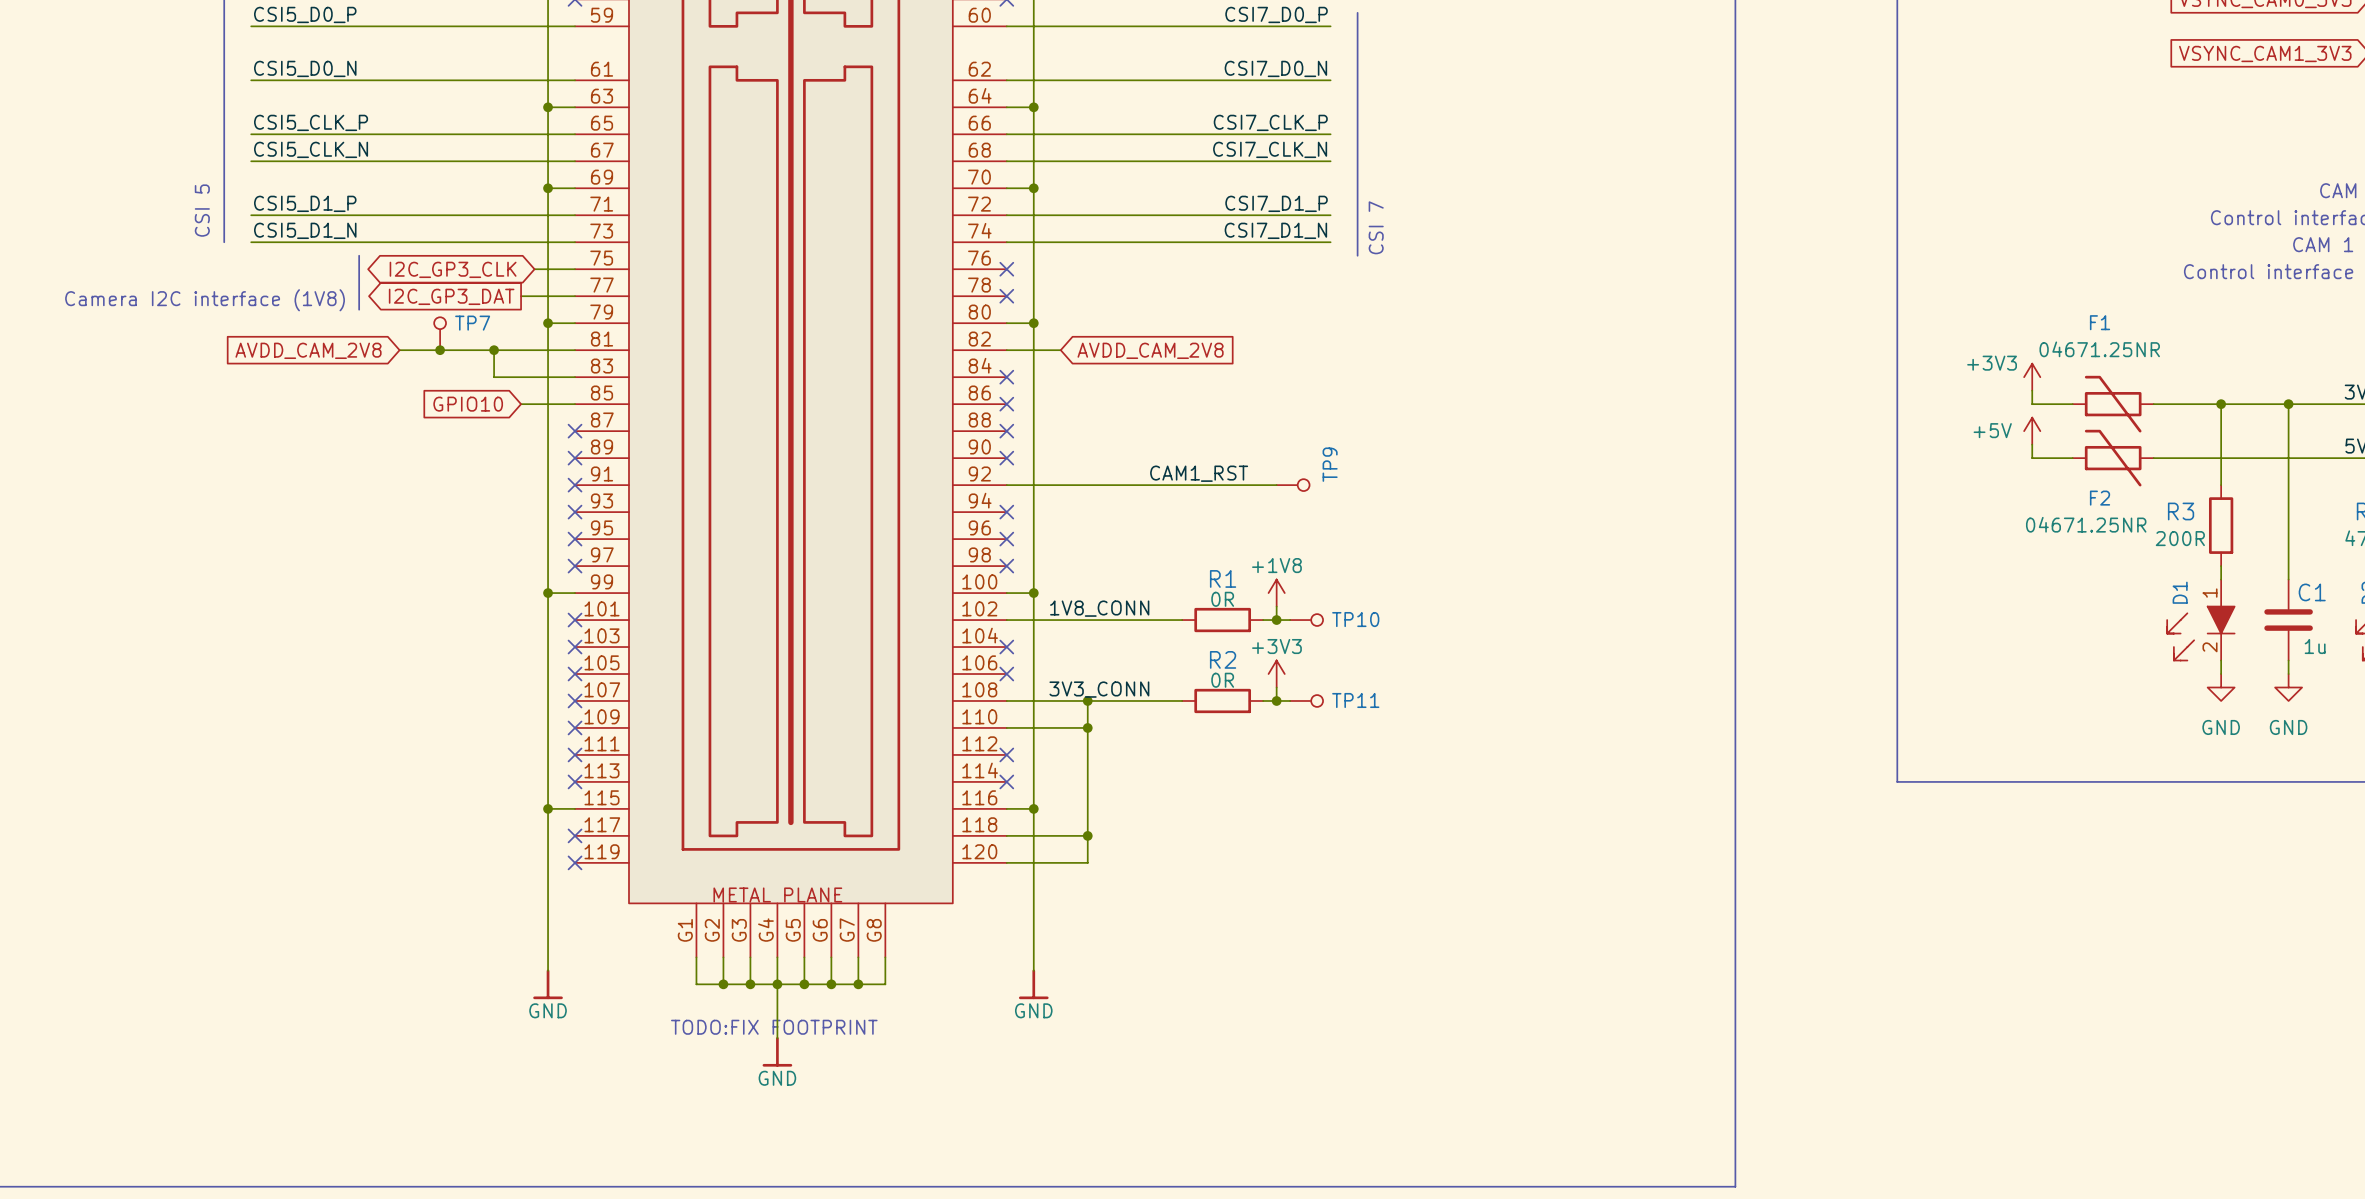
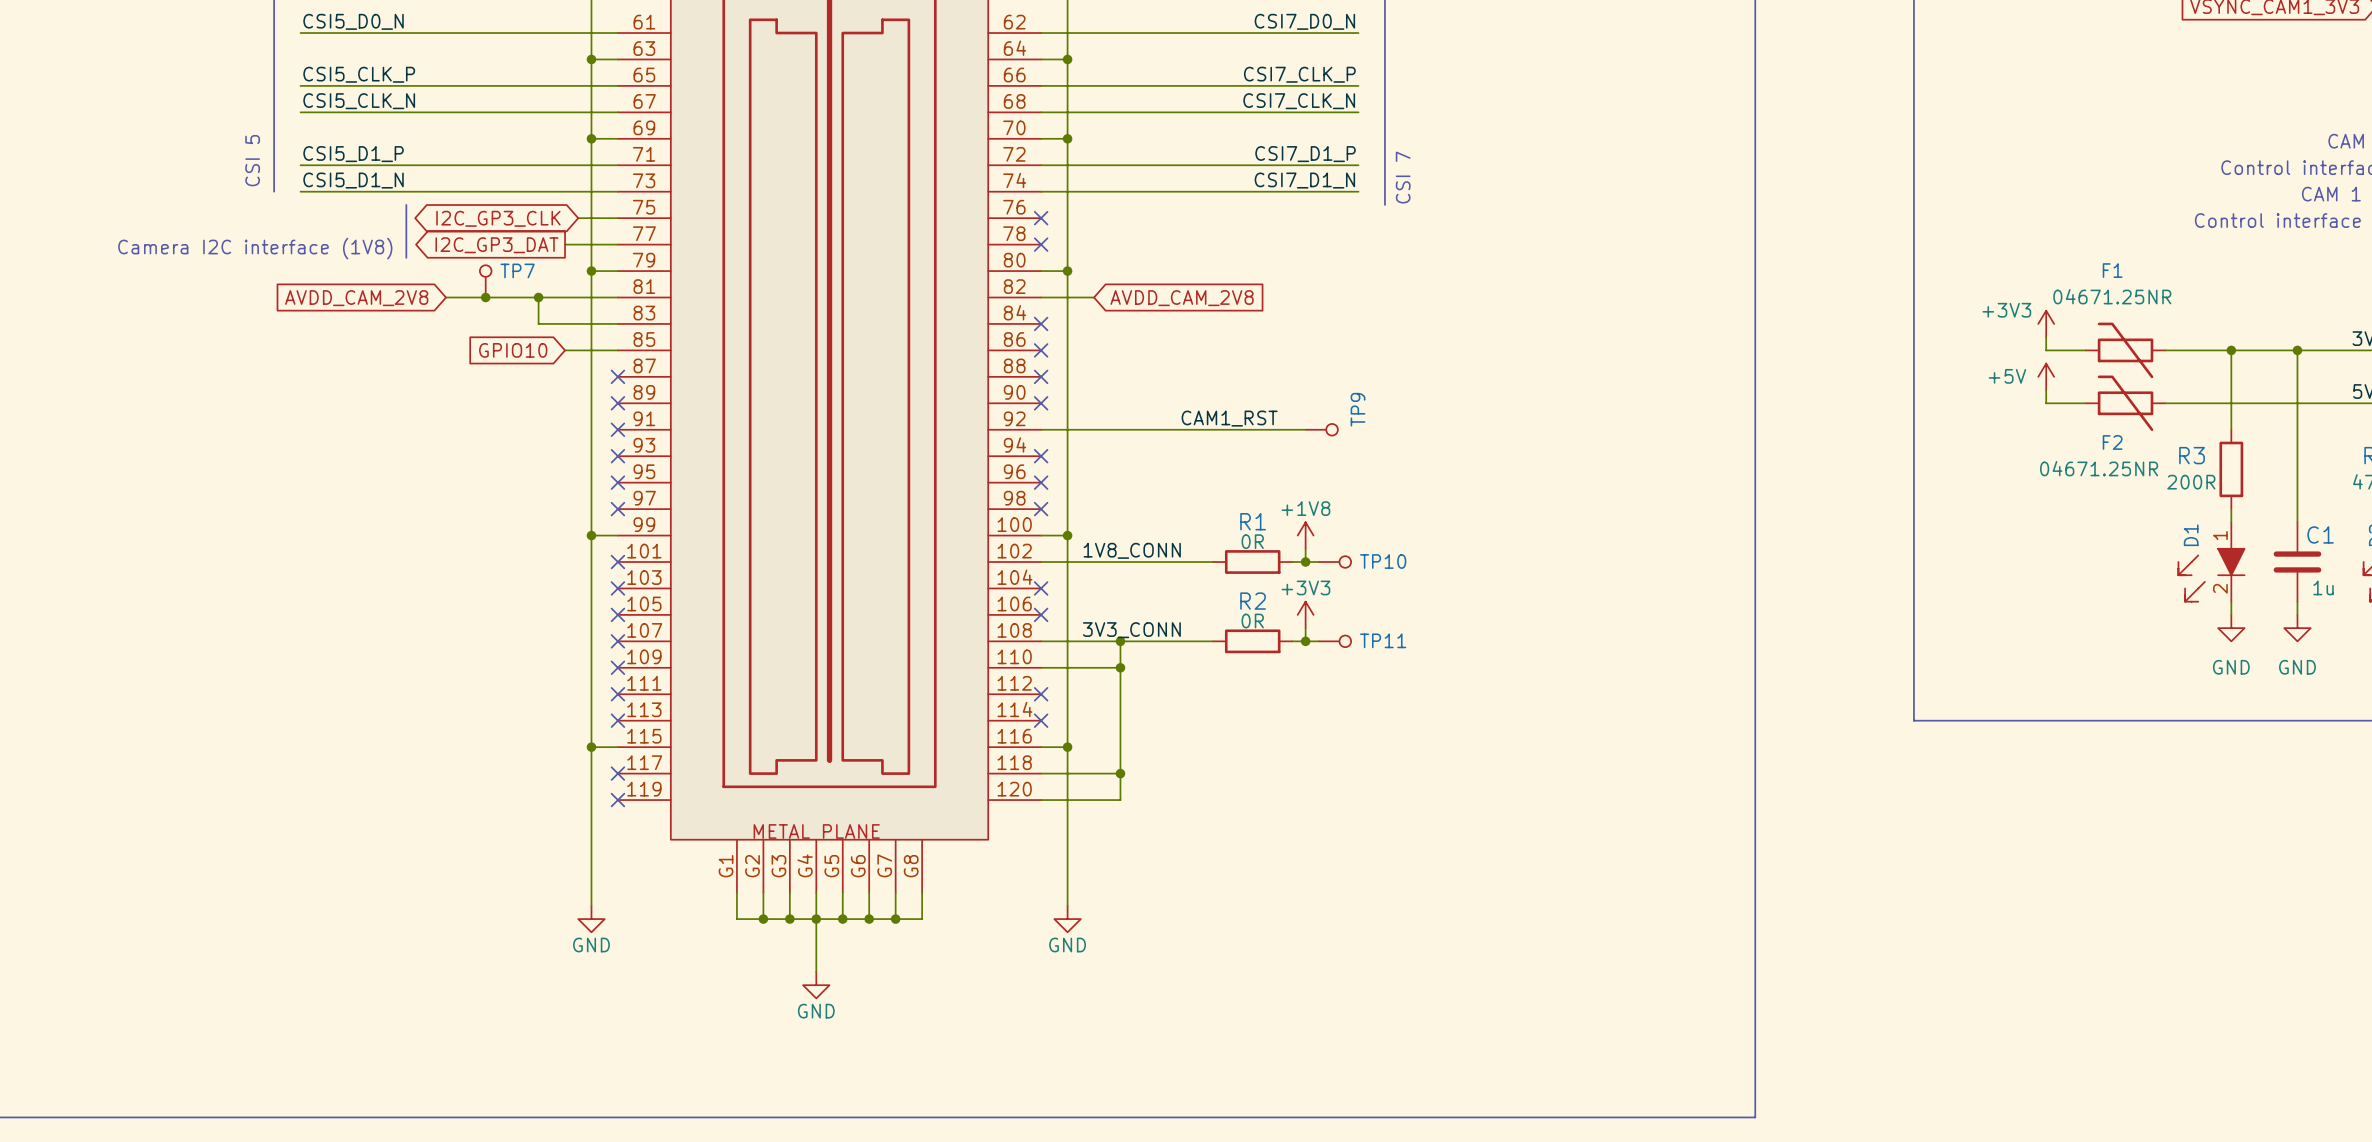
power symbol shape: [533, 969, 563, 1000] -> [578, 905, 605, 933]
power symbol shape: [1018, 969, 1049, 1000] -> [1054, 905, 1081, 933]
text: TODO:FIX FOOTPRINT (774, 1027) -> none
power symbol shape: [762, 1036, 793, 1067] -> [803, 971, 830, 999]

